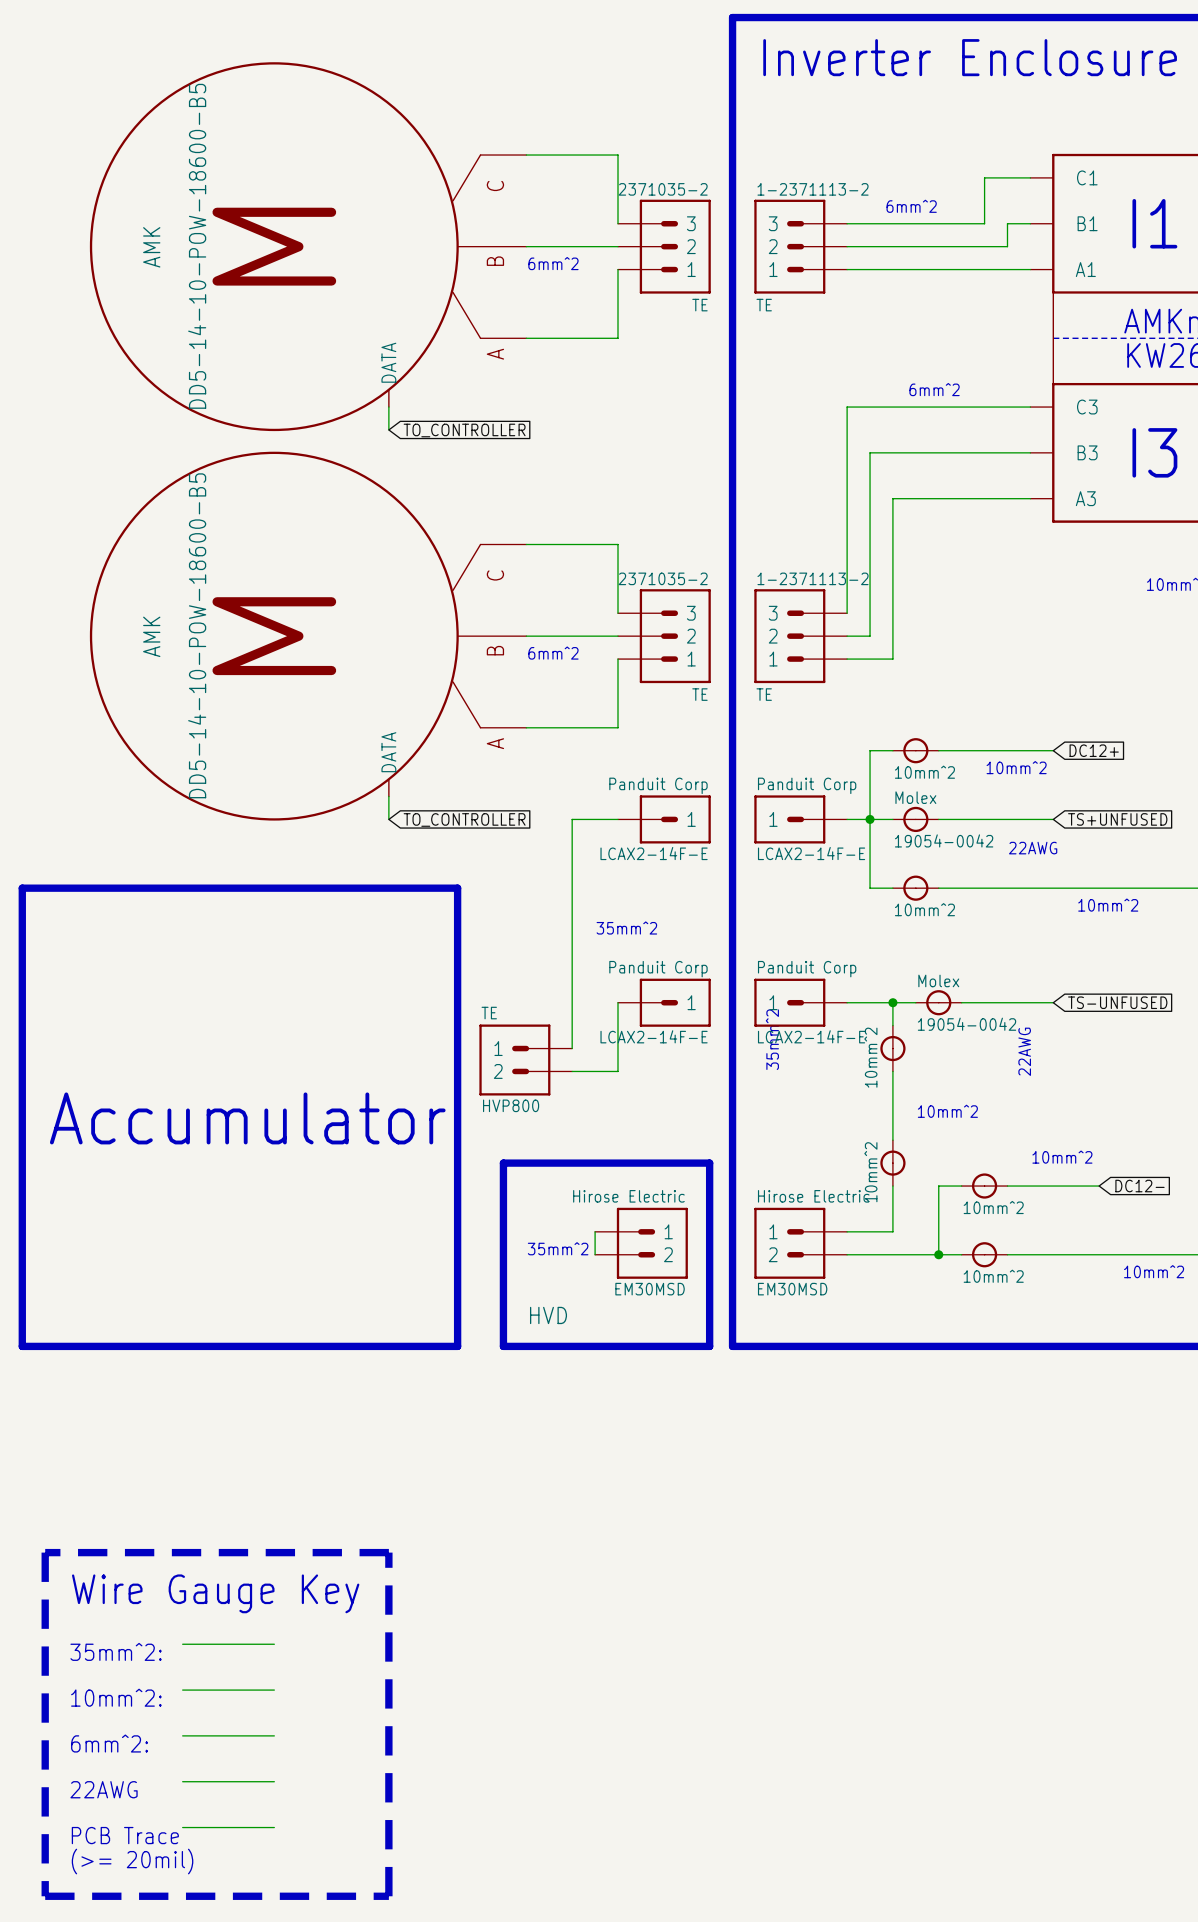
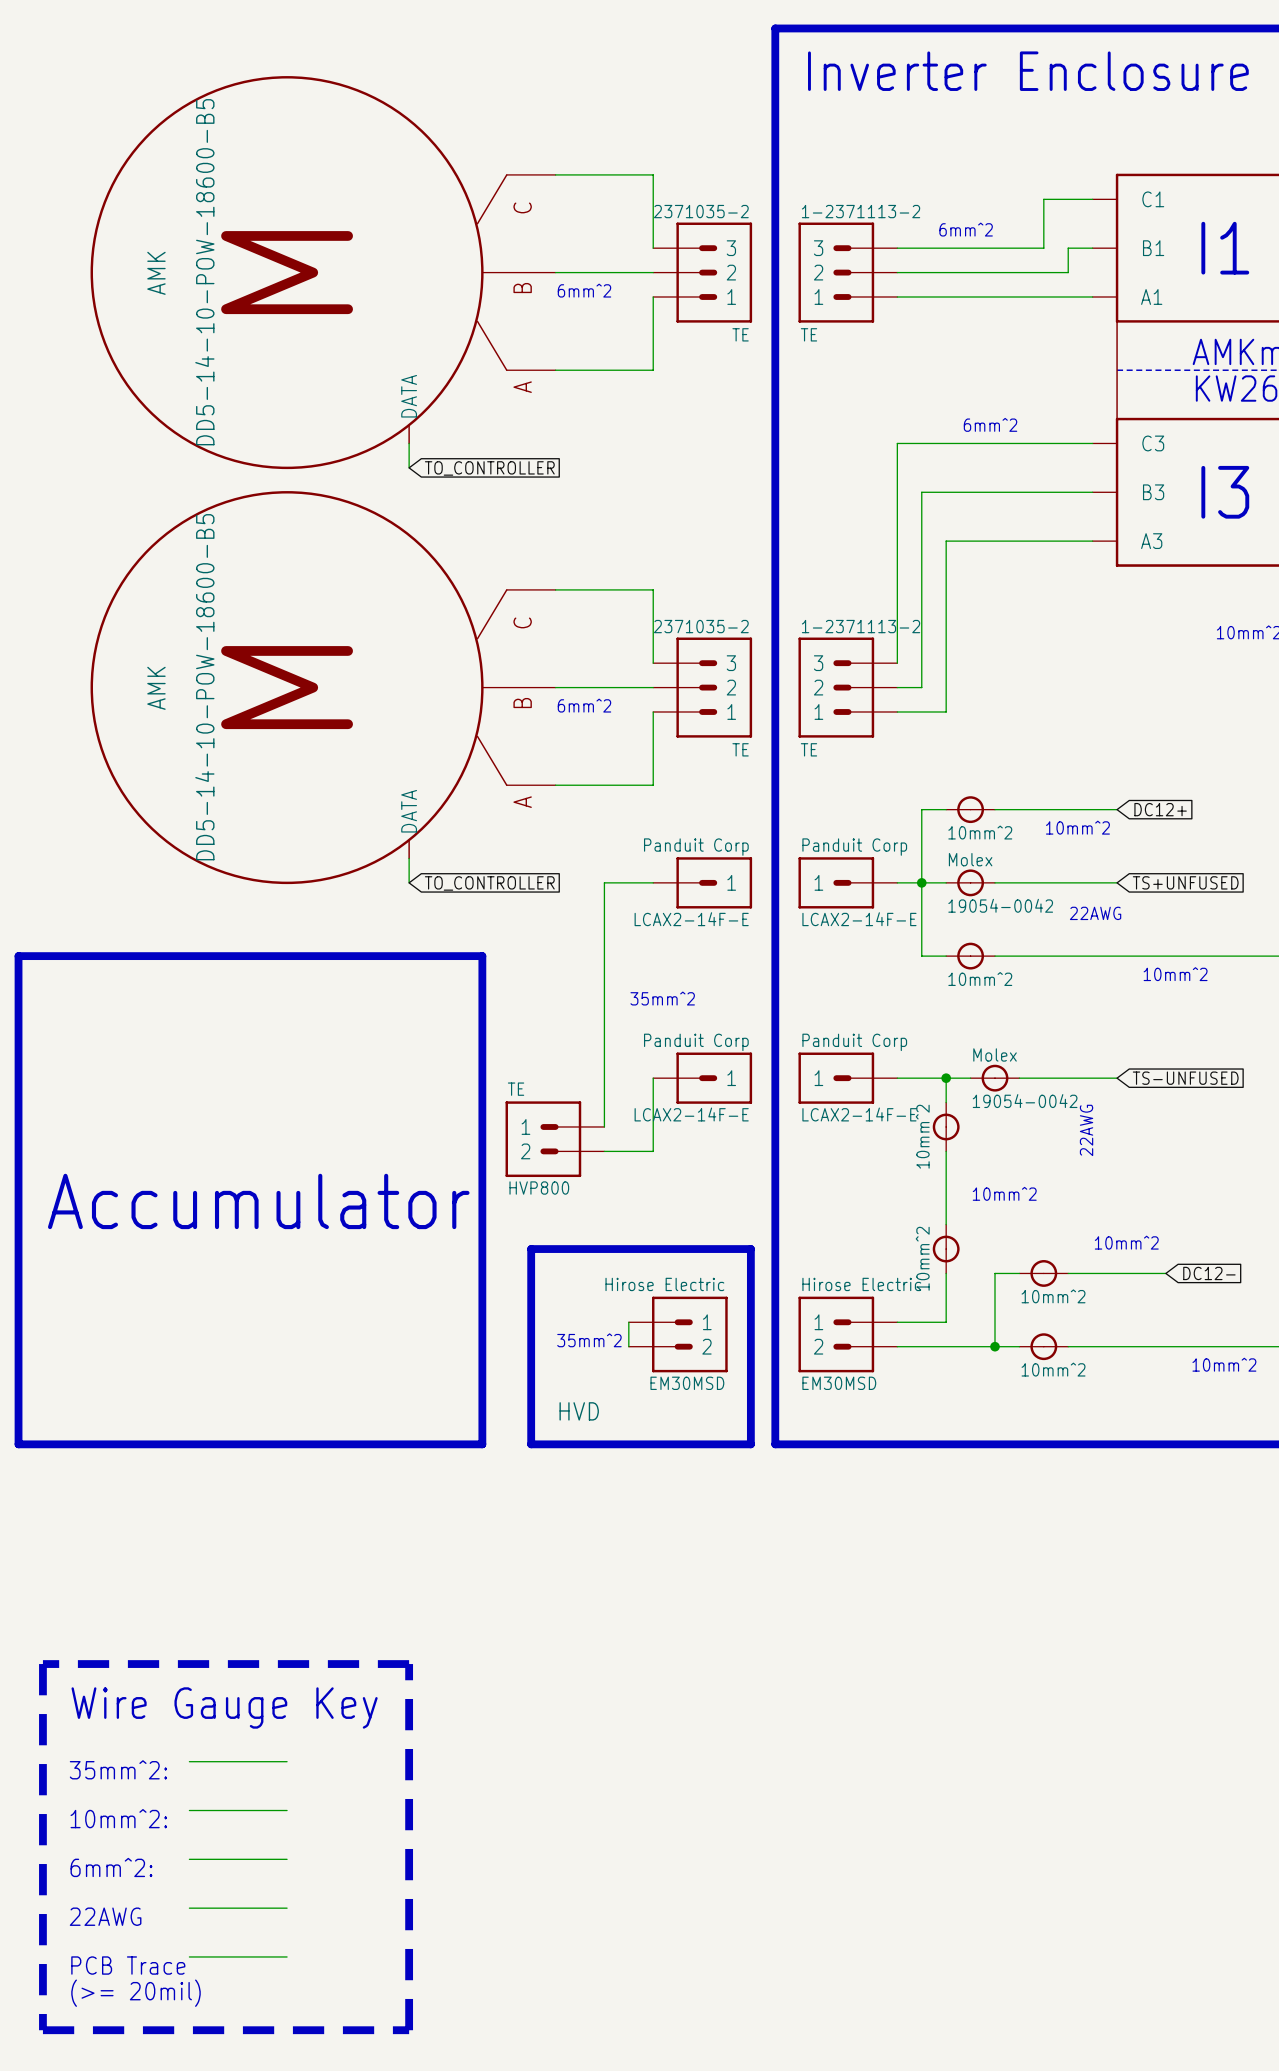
text: 35mm^2 (772, 1039) -> none

